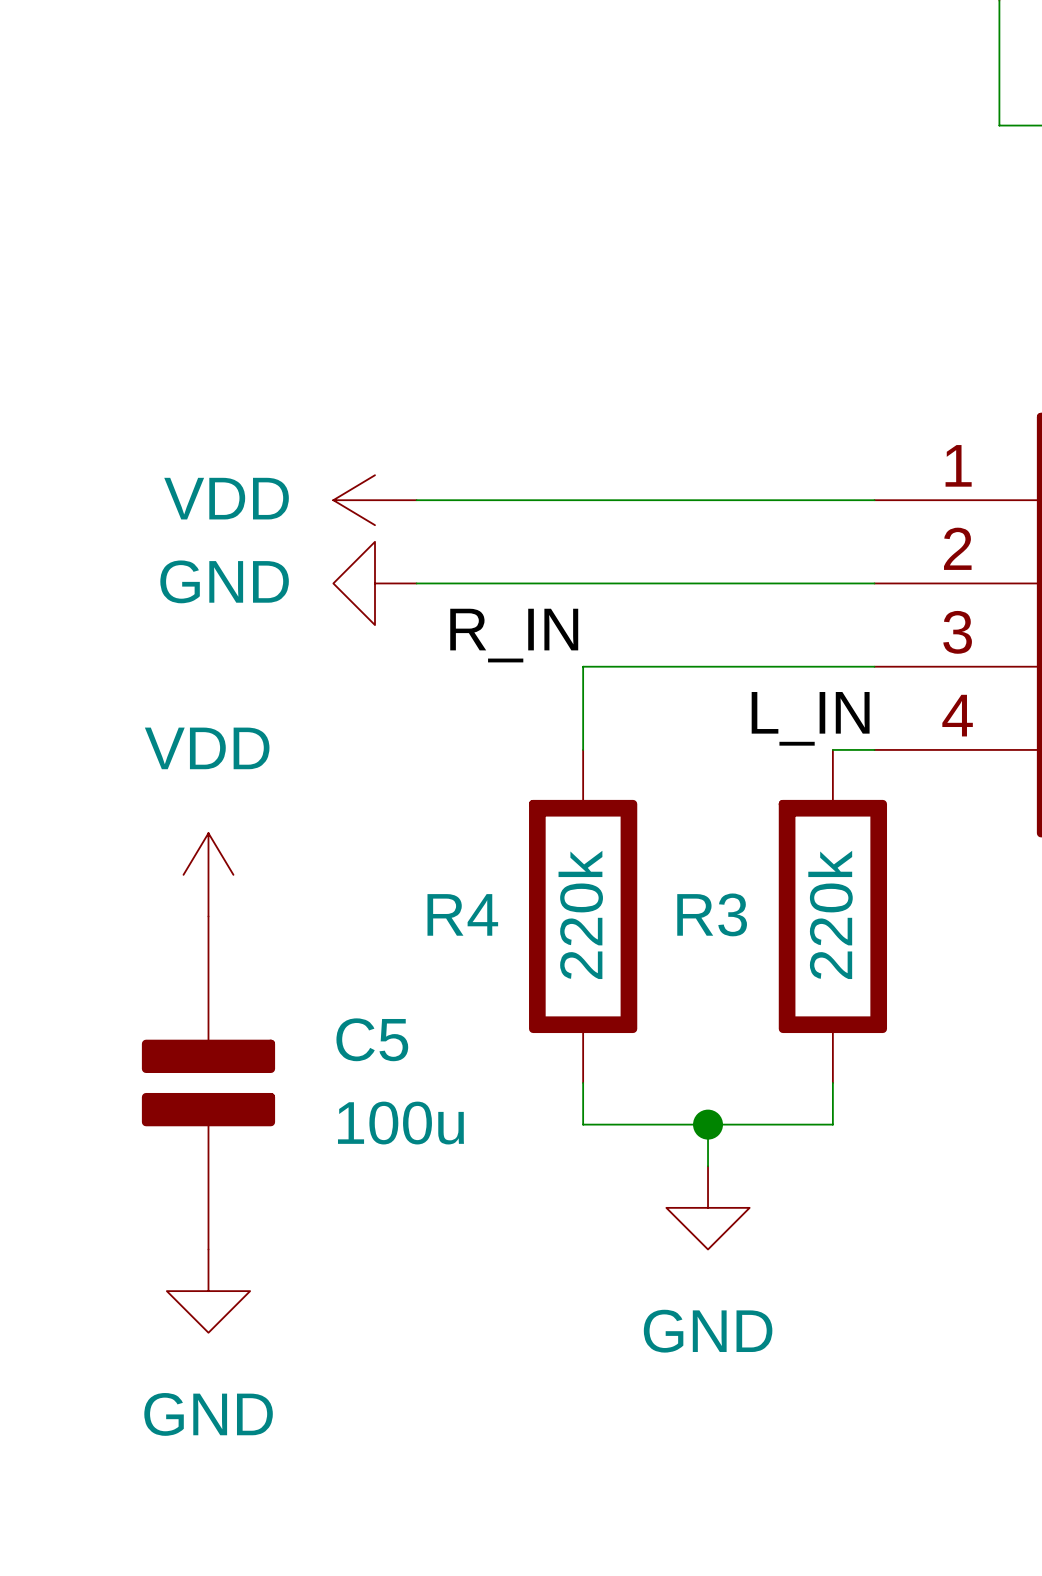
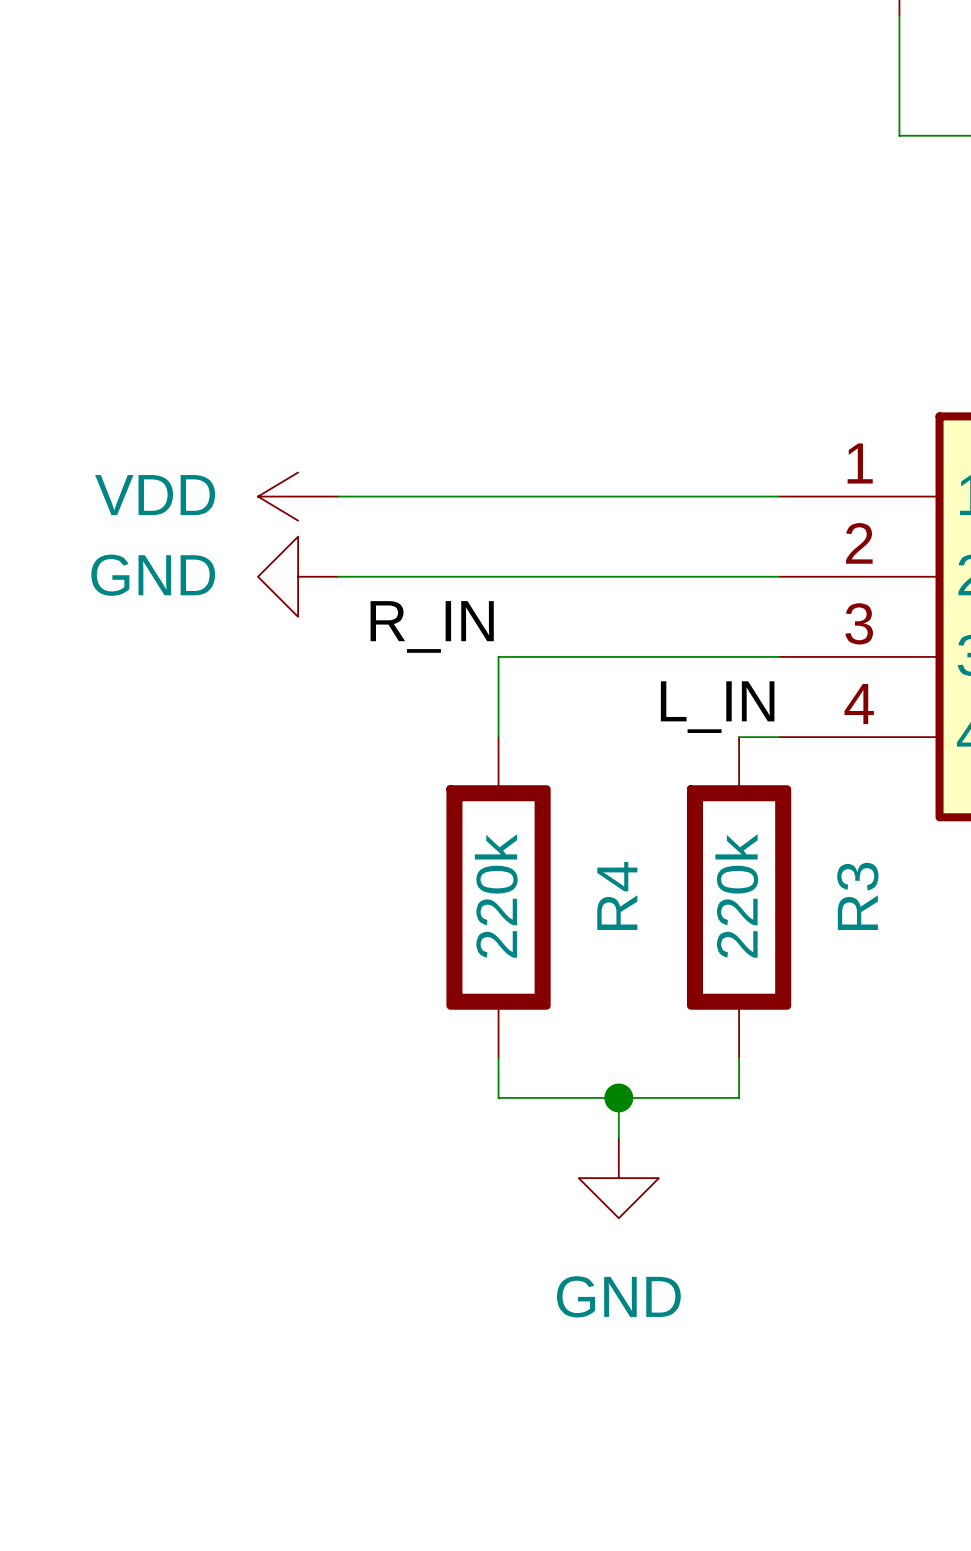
power symbol: VDD (208, 874) -> none
R4 name rotation: 0° (462, 914) -> 90° counterclockwise (617, 895)
R4 name position: R4 (462, 914) -> R4 (617, 895)
R3 name rotation: 0° (712, 914) -> 90° counterclockwise (857, 896)
R3 name position: R3 (712, 914) -> R3 (857, 896)
C5: 100u (208, 1082) -> none
power symbol: GND (208, 1291) -> none

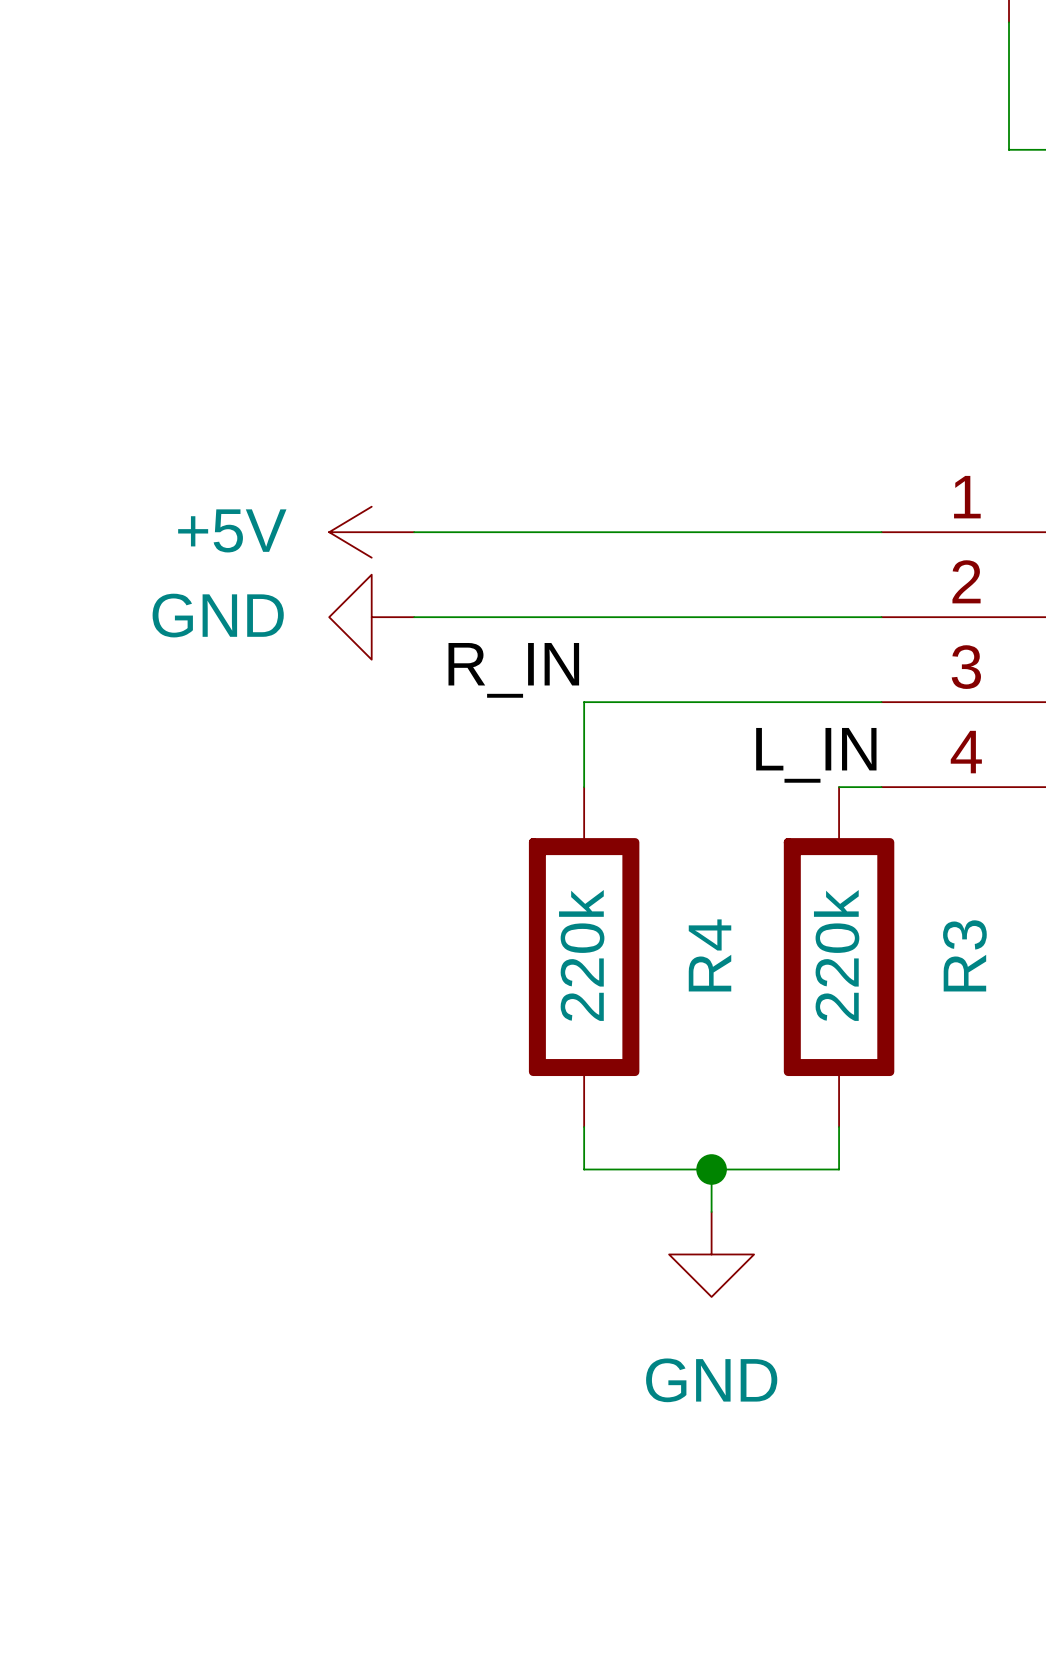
power symbol: VDD (298, 496) -> +5V (371, 532)

